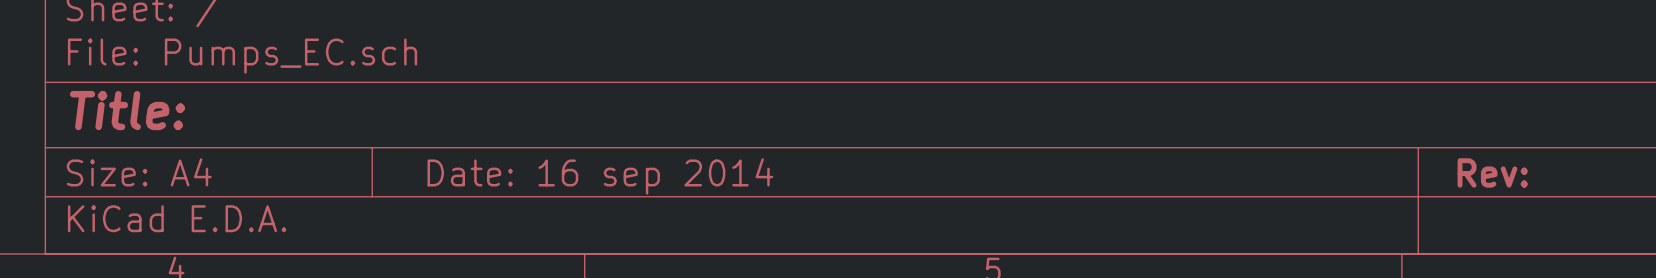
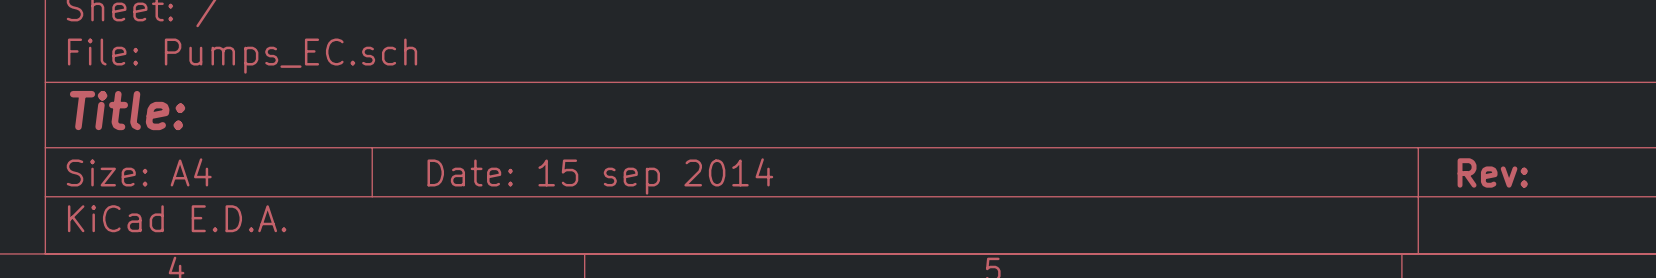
title block: Date: 16 sep 2014 (600, 176) -> Date: 15 sep 2014 (600, 176)

